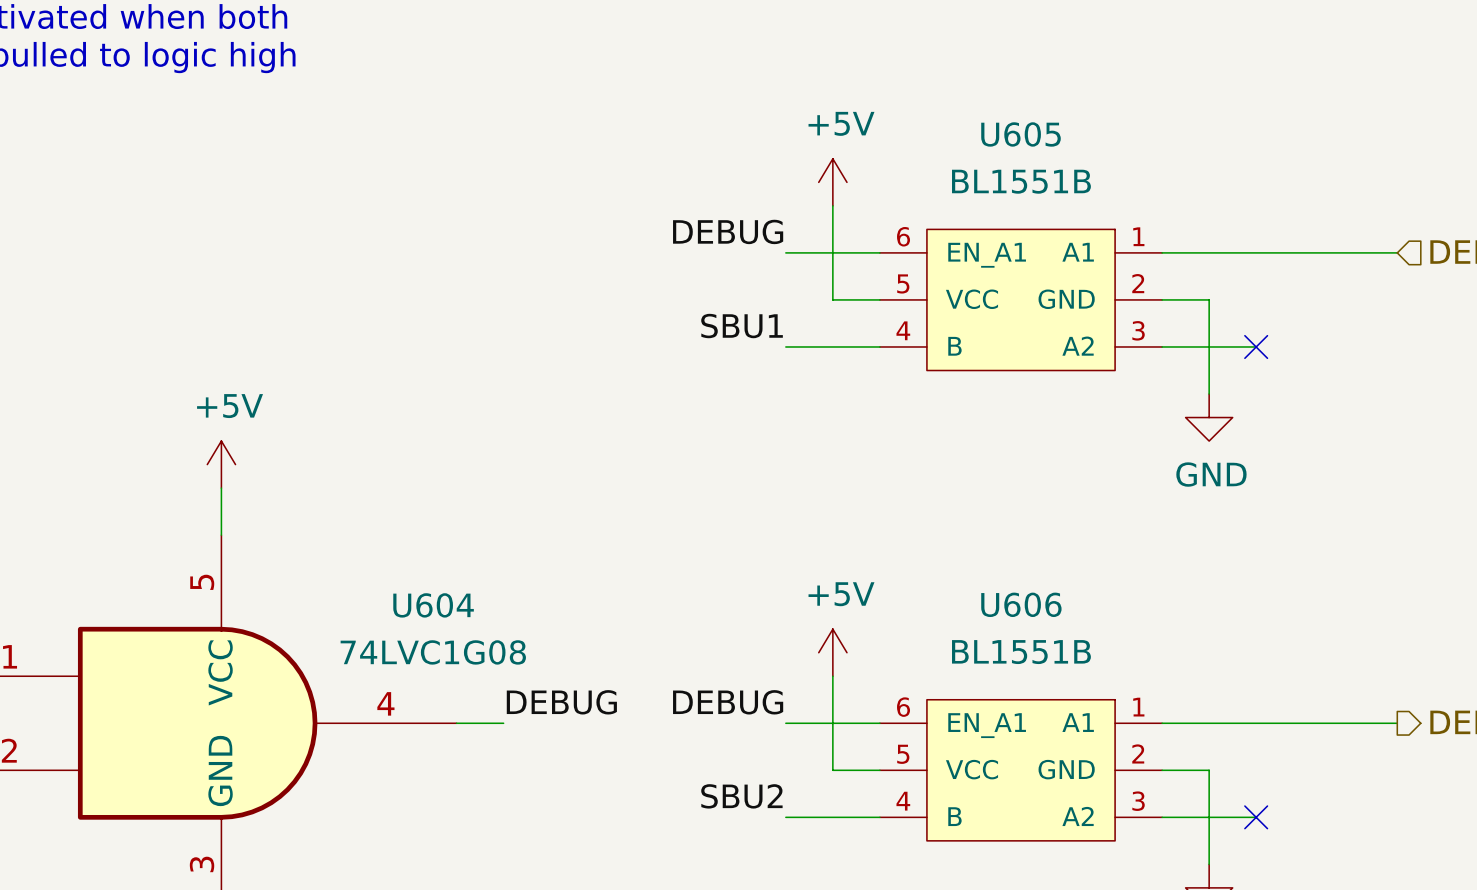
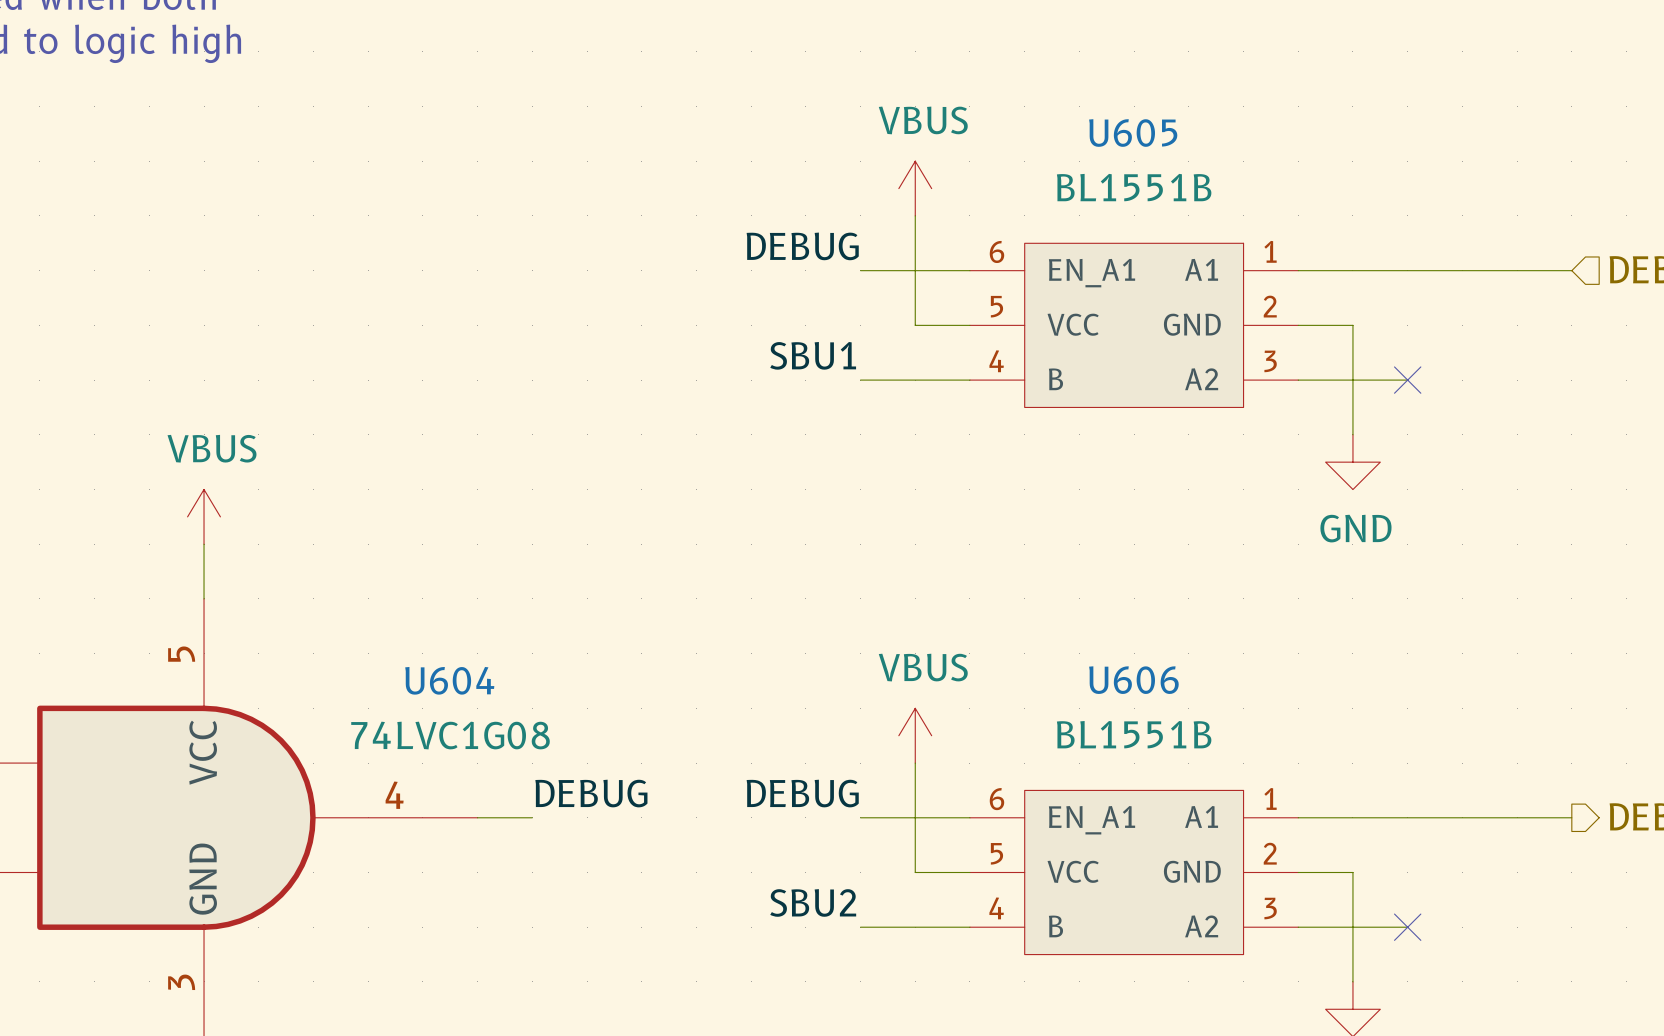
power symbol: +5V (832, 182) -> VBUS (915, 188)
power symbol: +5V (221, 464) -> VBUS (204, 516)
power symbol: +5V (832, 652) -> VBUS (915, 735)

